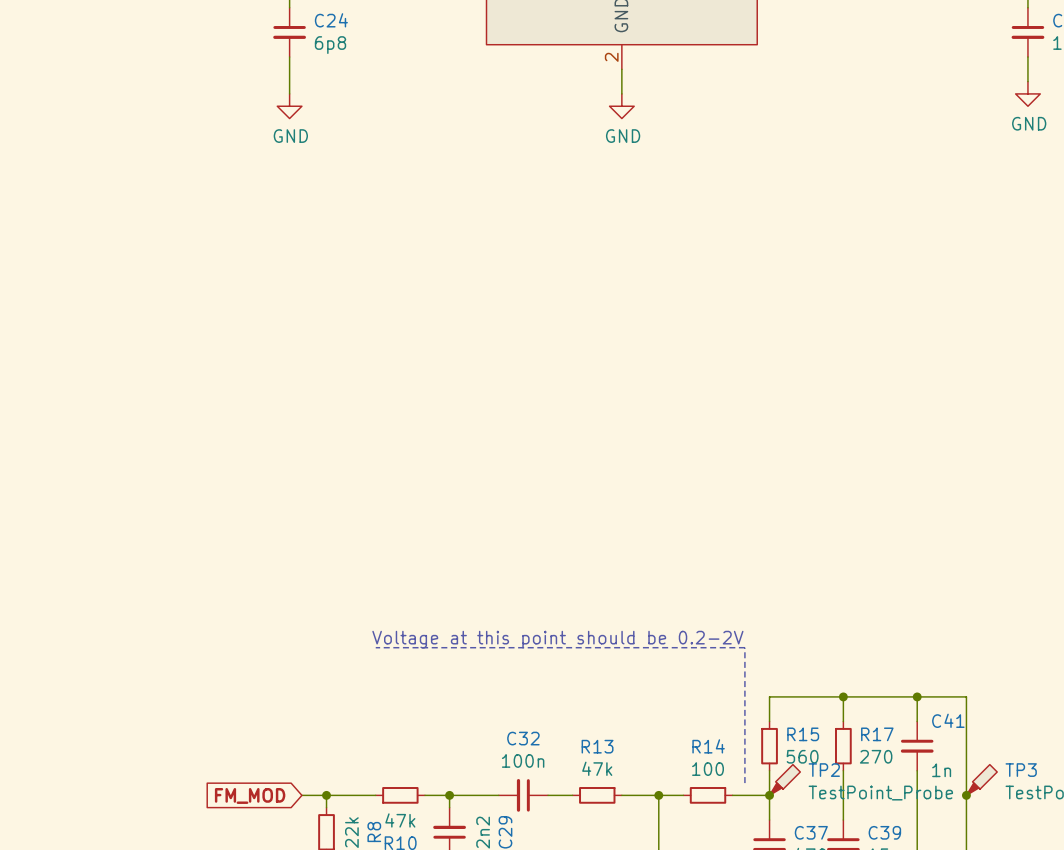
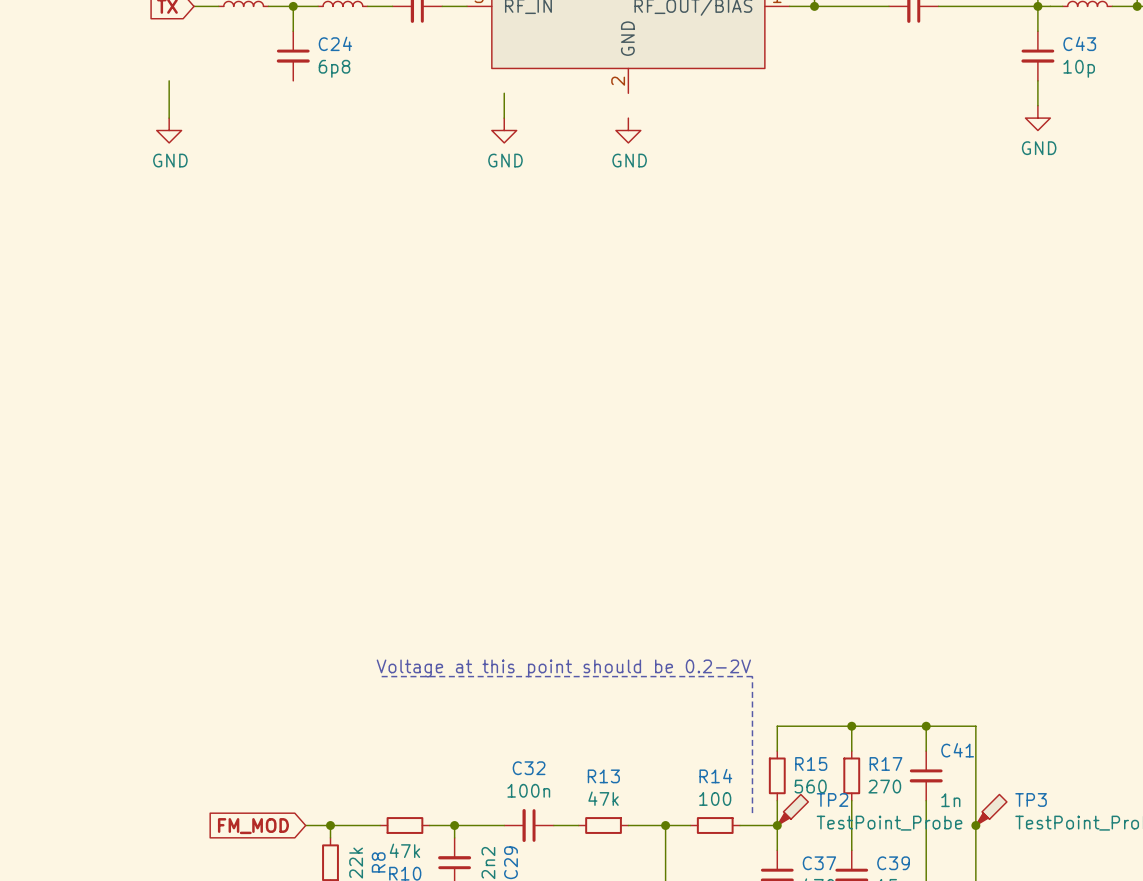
wire: (289, 57) (289, 93) -> (169, 80) (169, 118)
wire: (621, 69) (621, 93) -> (504, 93) (504, 118)
power symbol: none -> GND (169, 130)
power symbol: GND (289, 106) -> none
power symbol: none -> GND (504, 130)

